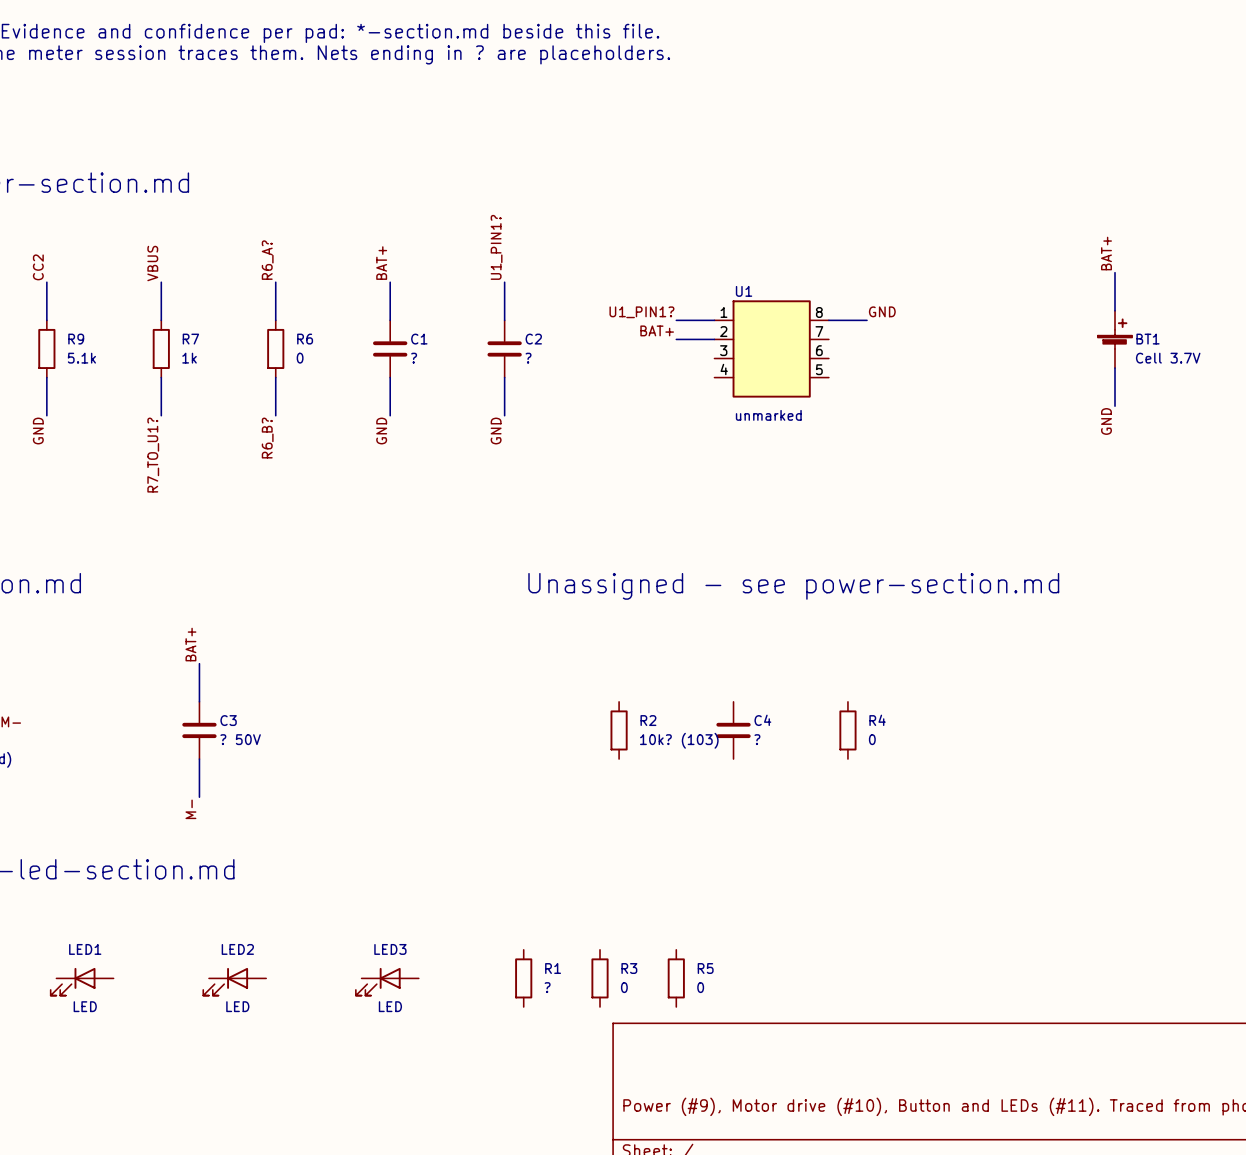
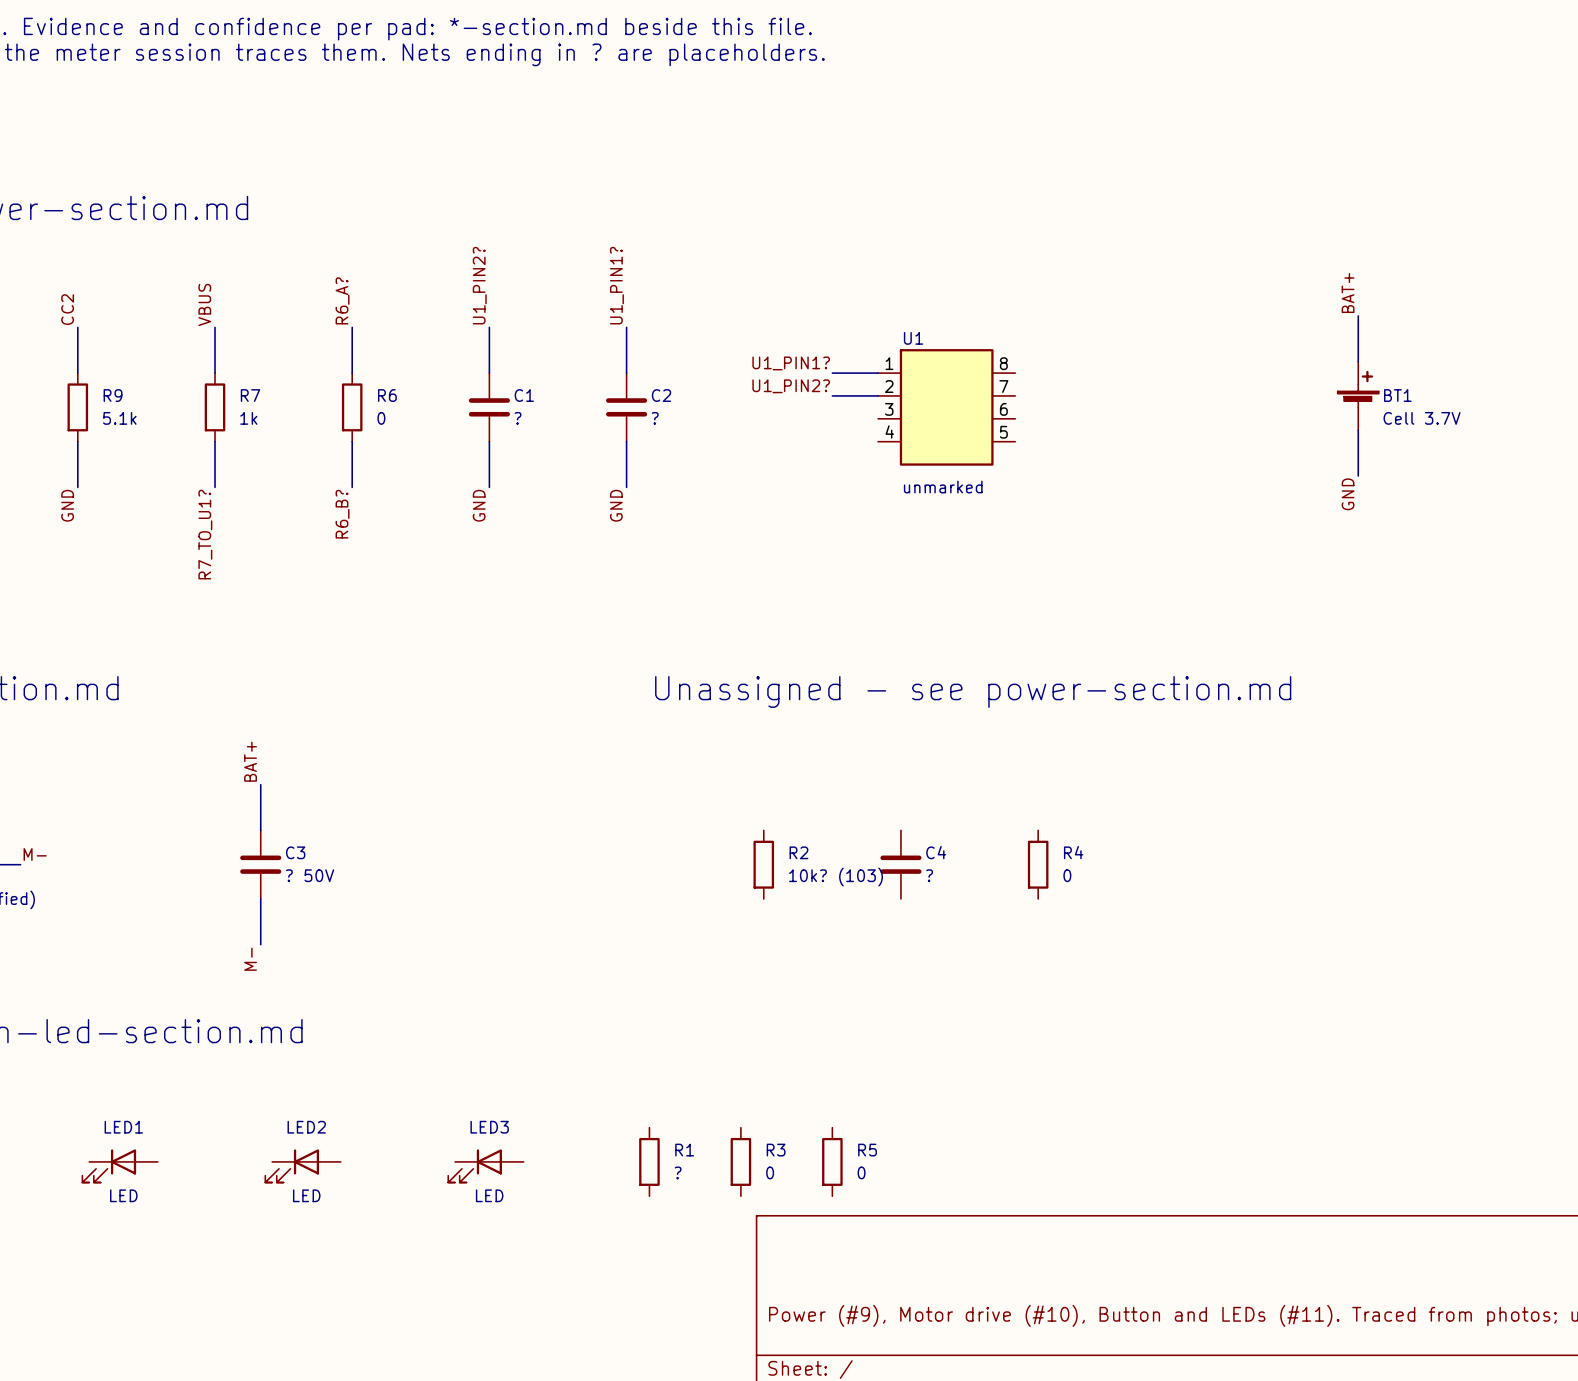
label: BAT+ (381, 263) -> U1_PIN2? (479, 285)
label: GND (882, 311) -> none
wire: (828, 320) (867, 320) -> none
label: BAT+ (657, 330) -> U1_PIN2? (791, 386)

